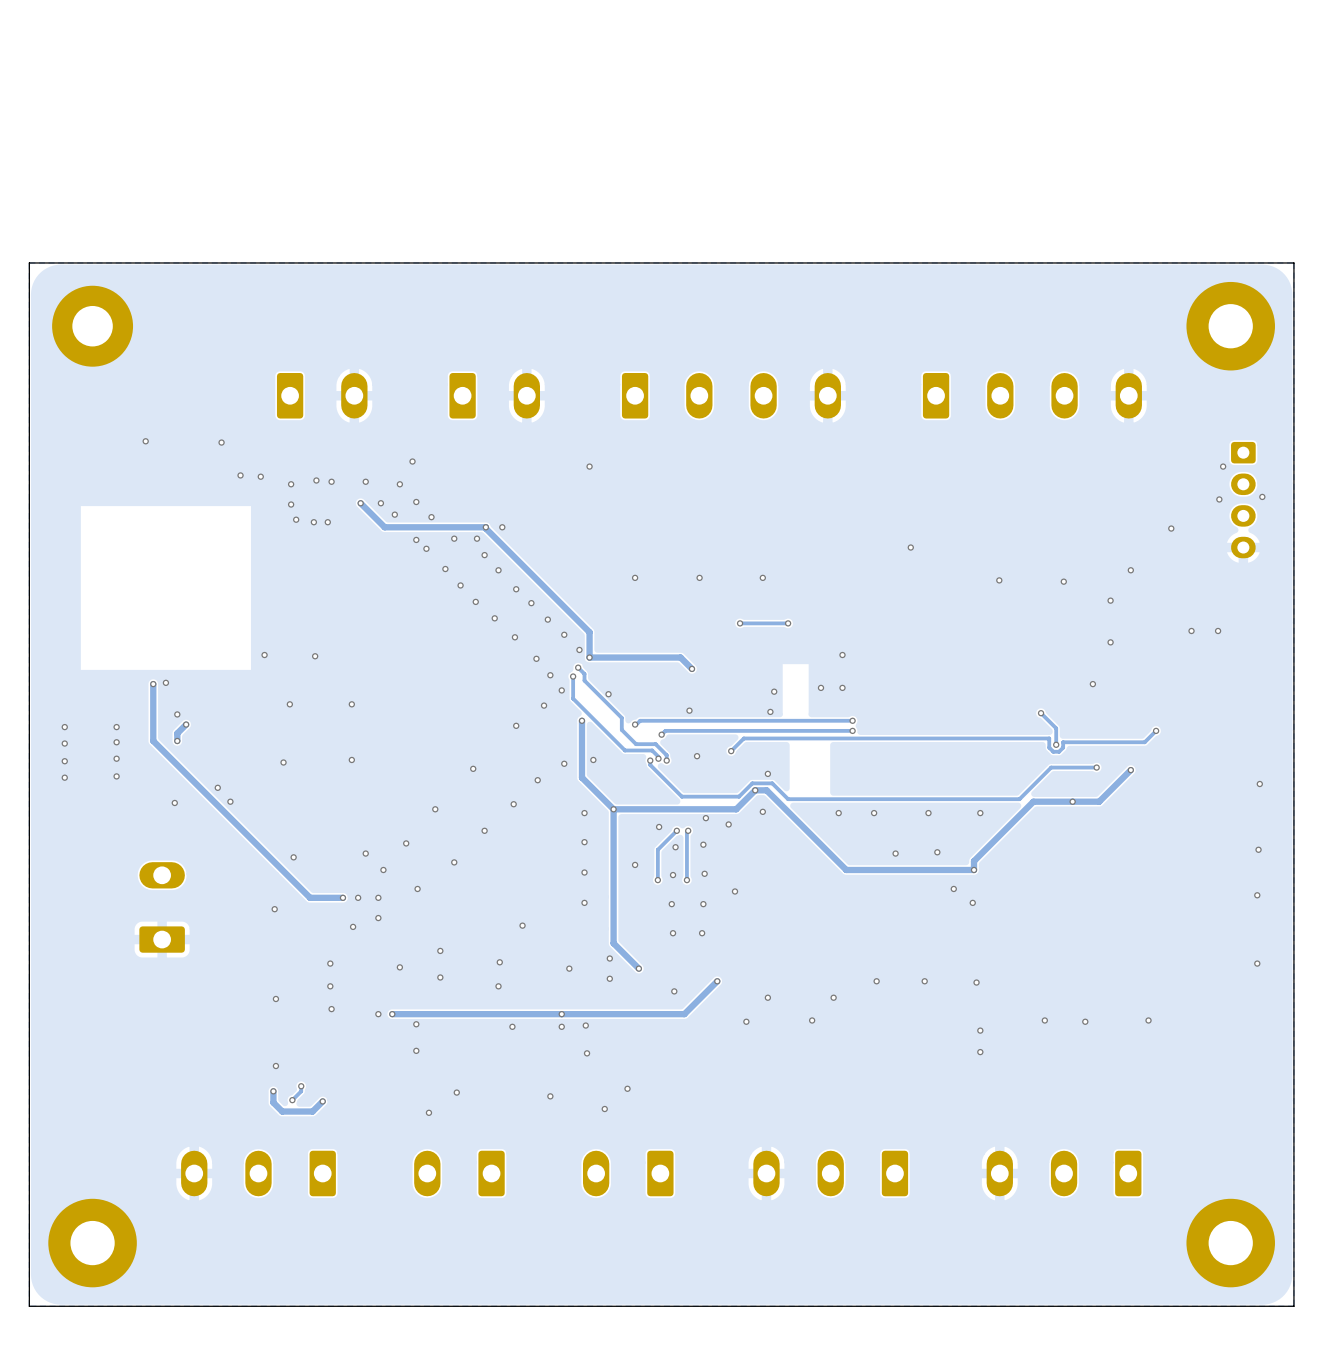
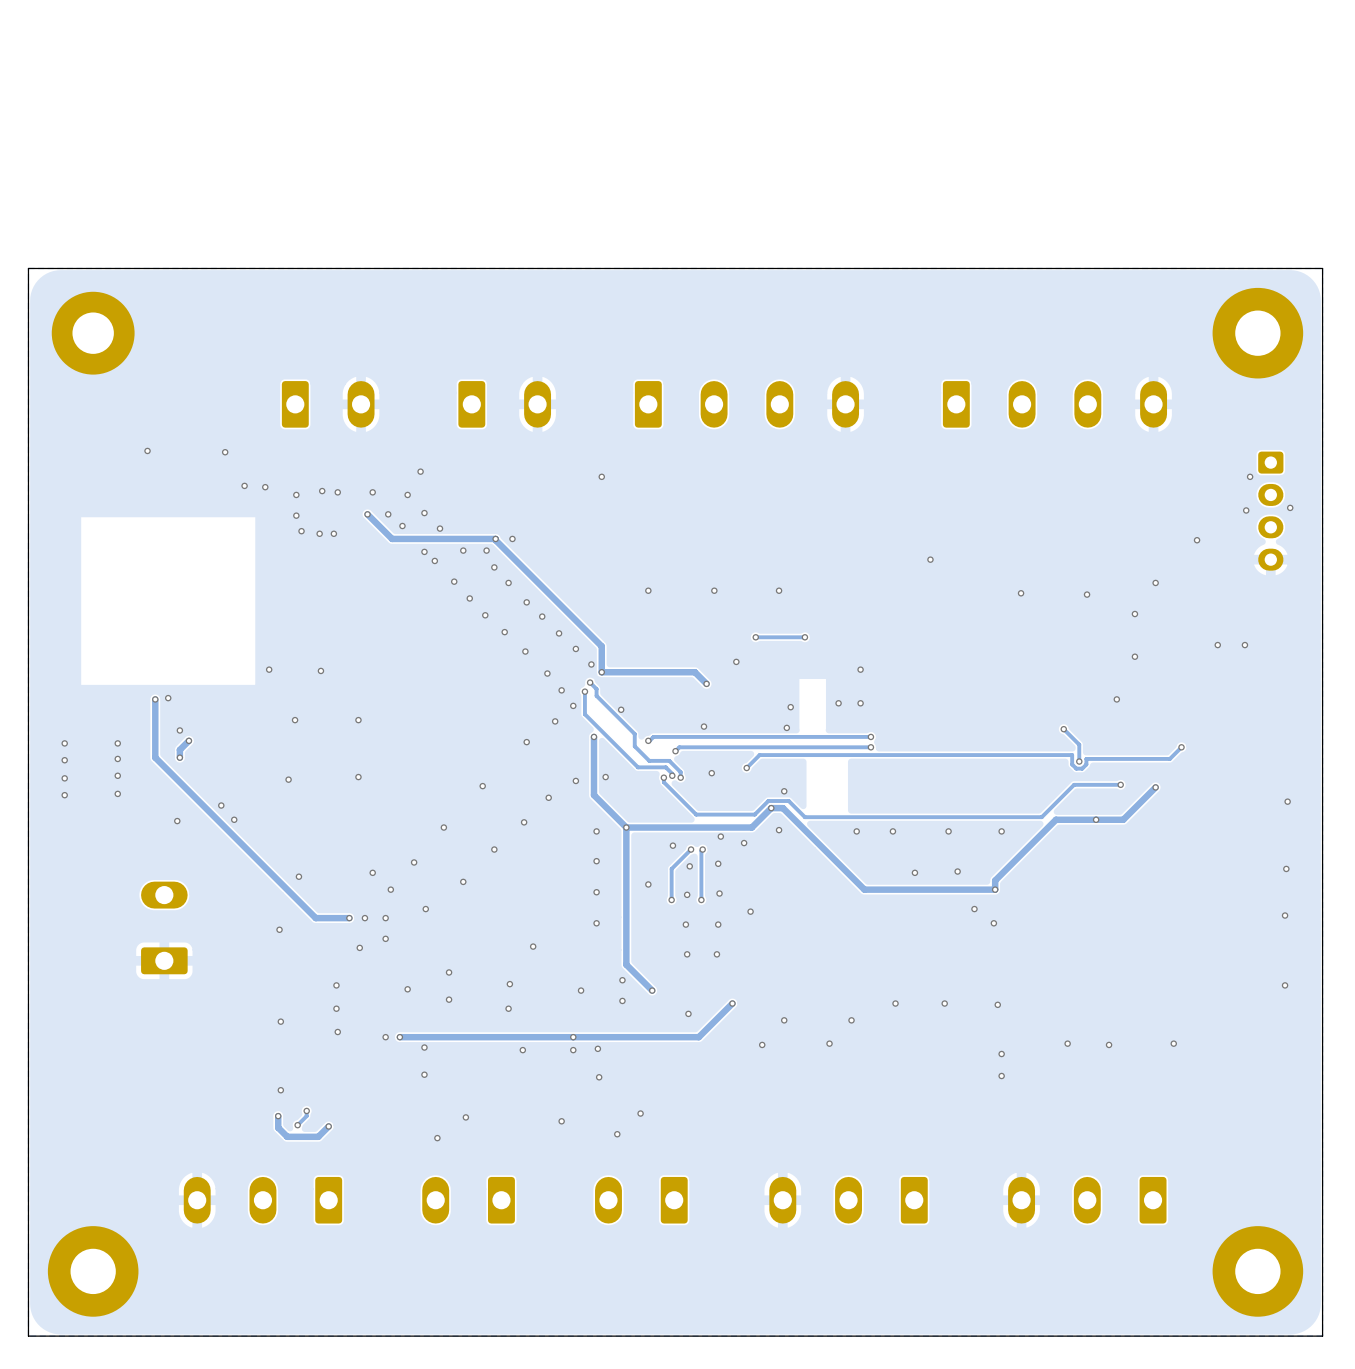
via: none -> (736, 661)

